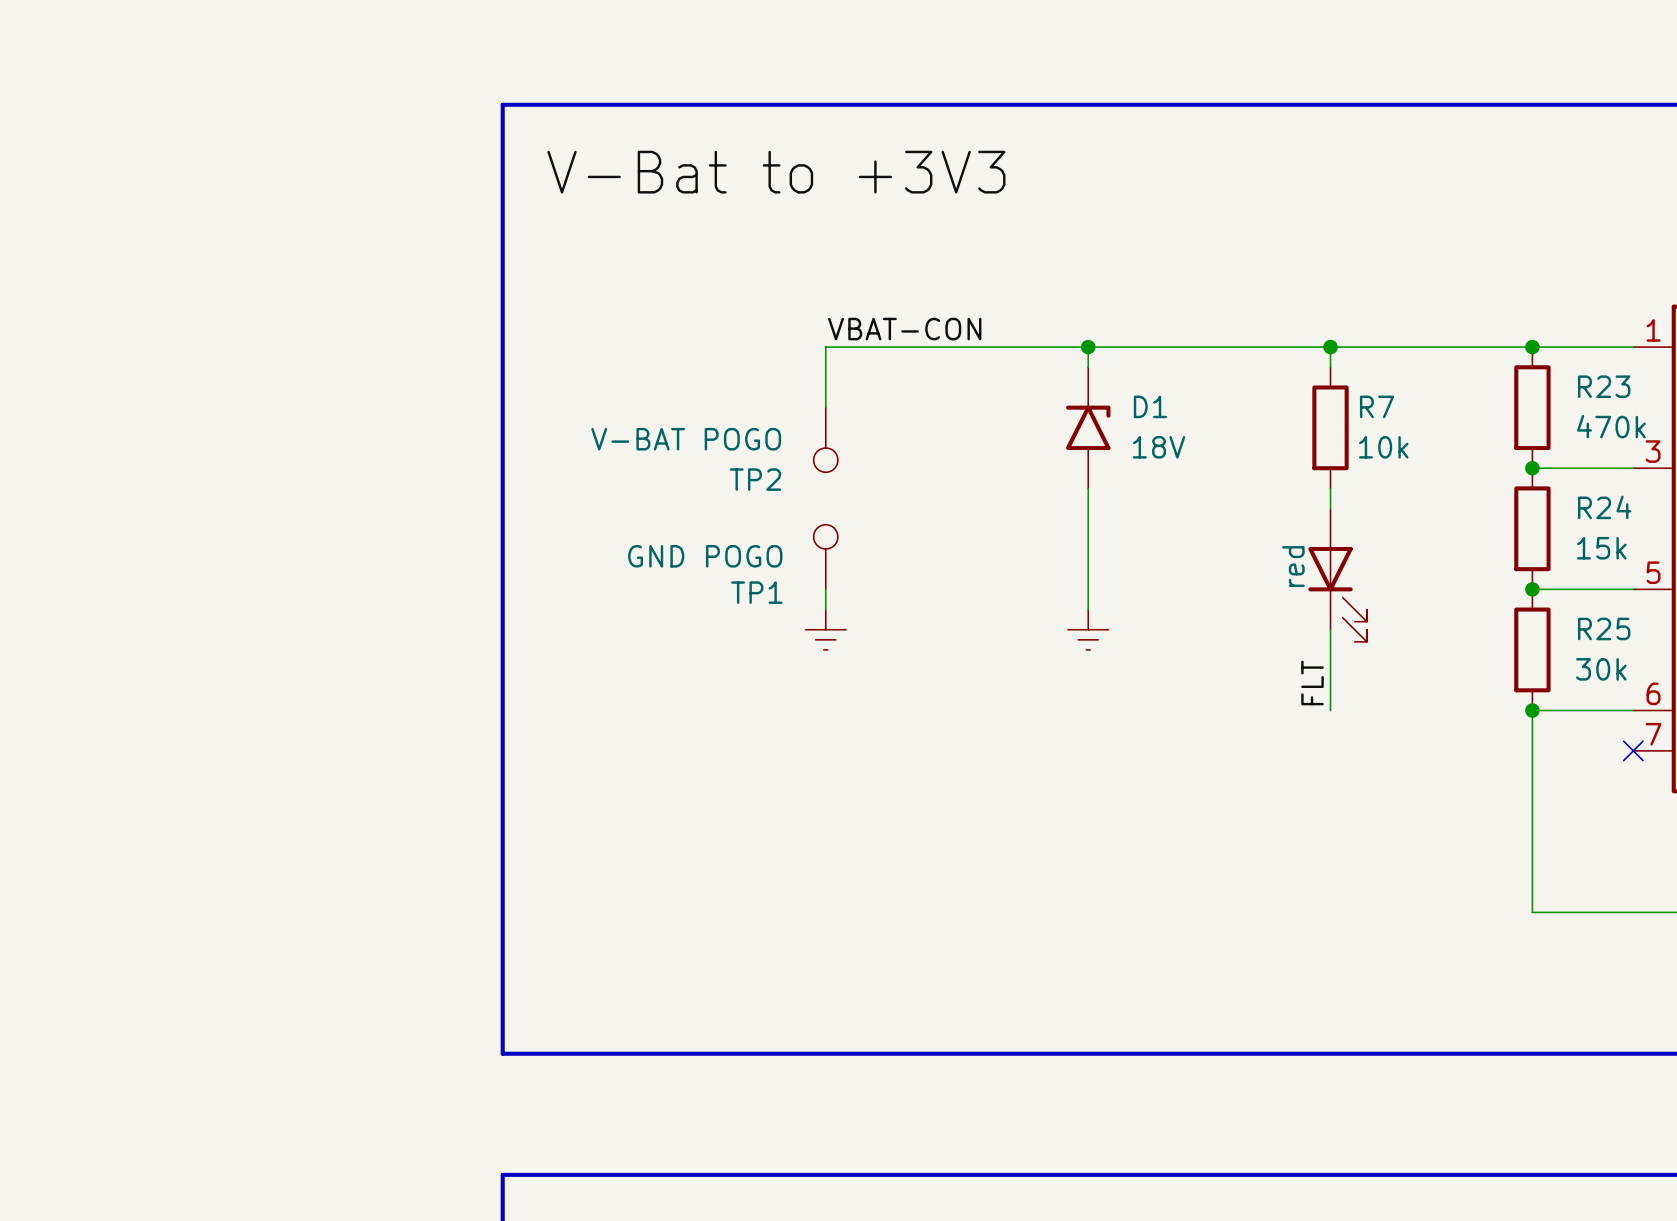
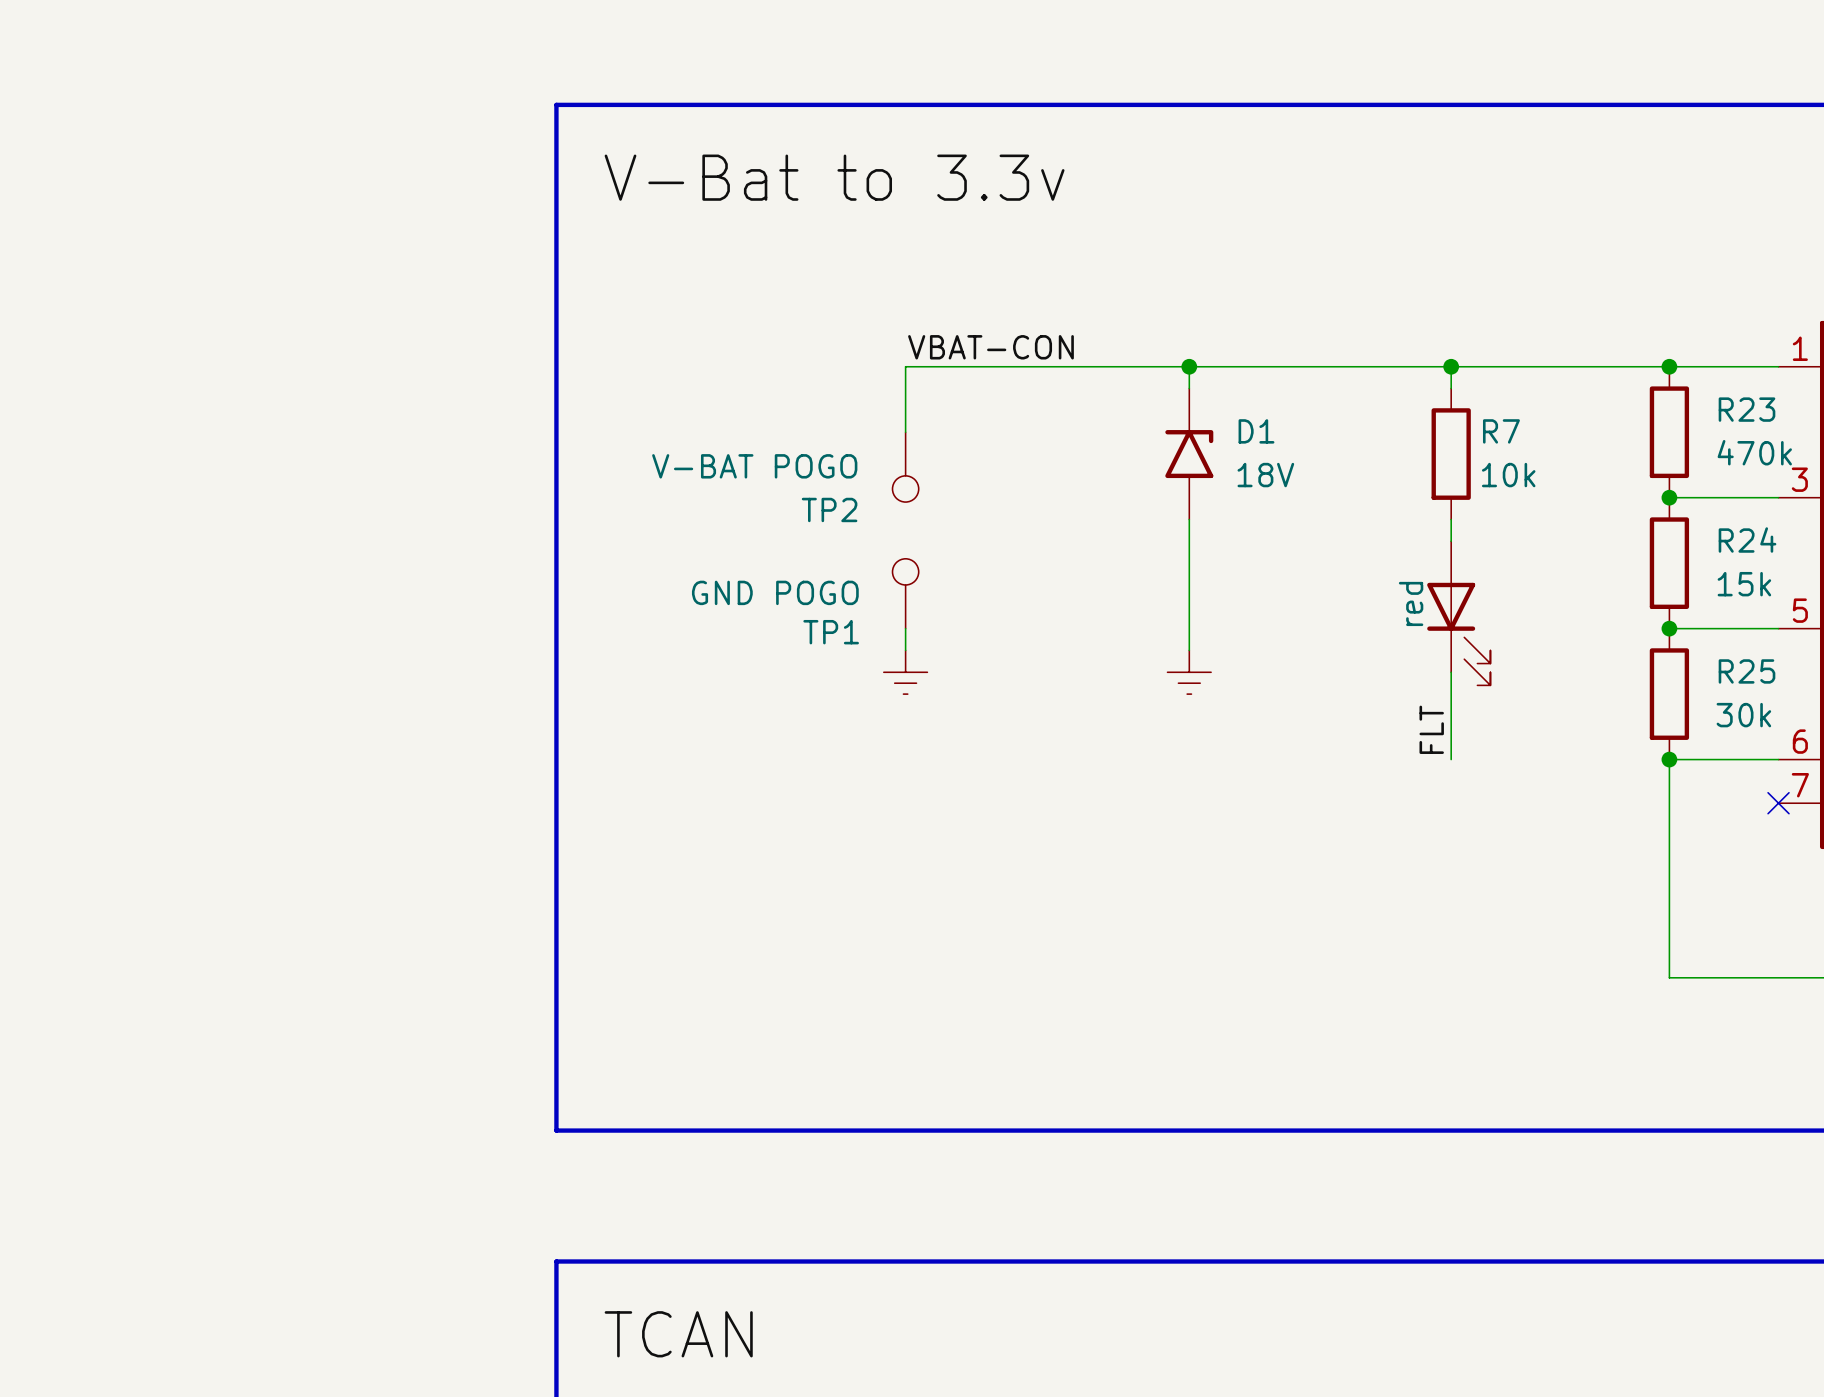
label: V-Bat to +3V3 (776, 172) -> V-Bat to 3.3v (834, 177)

